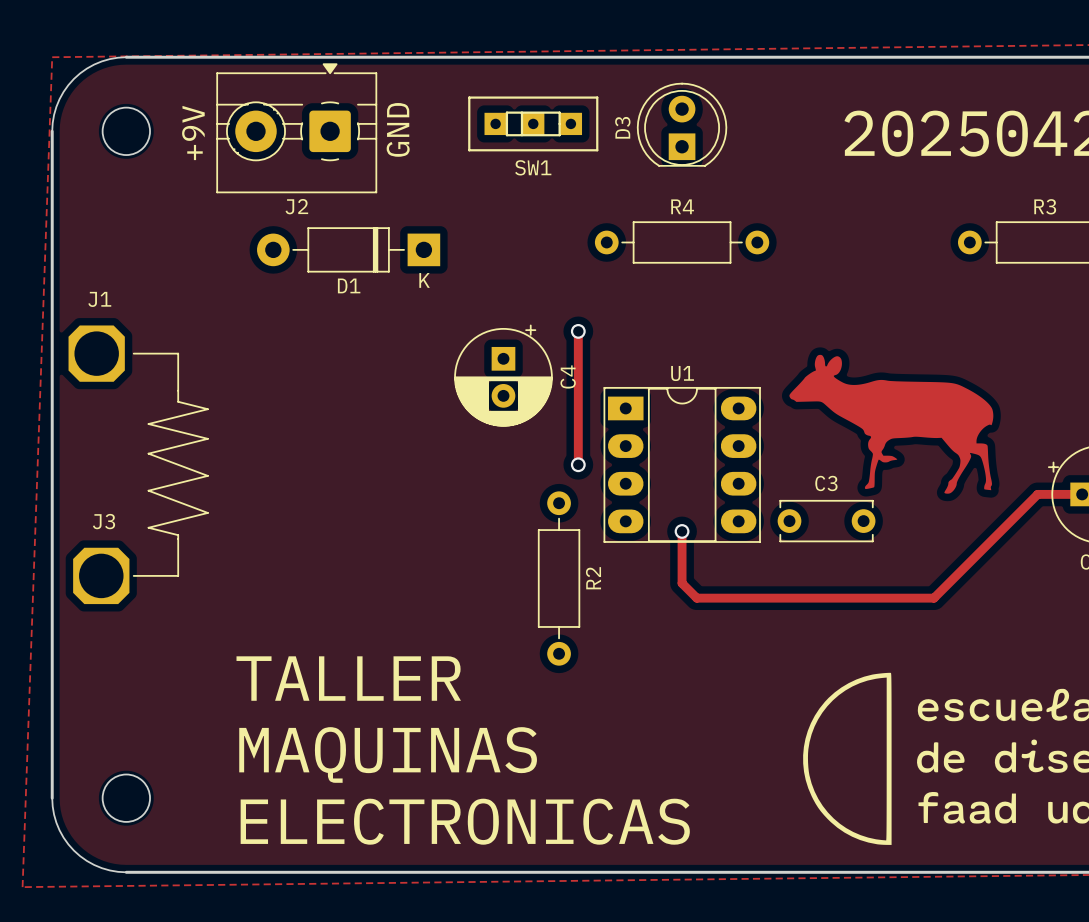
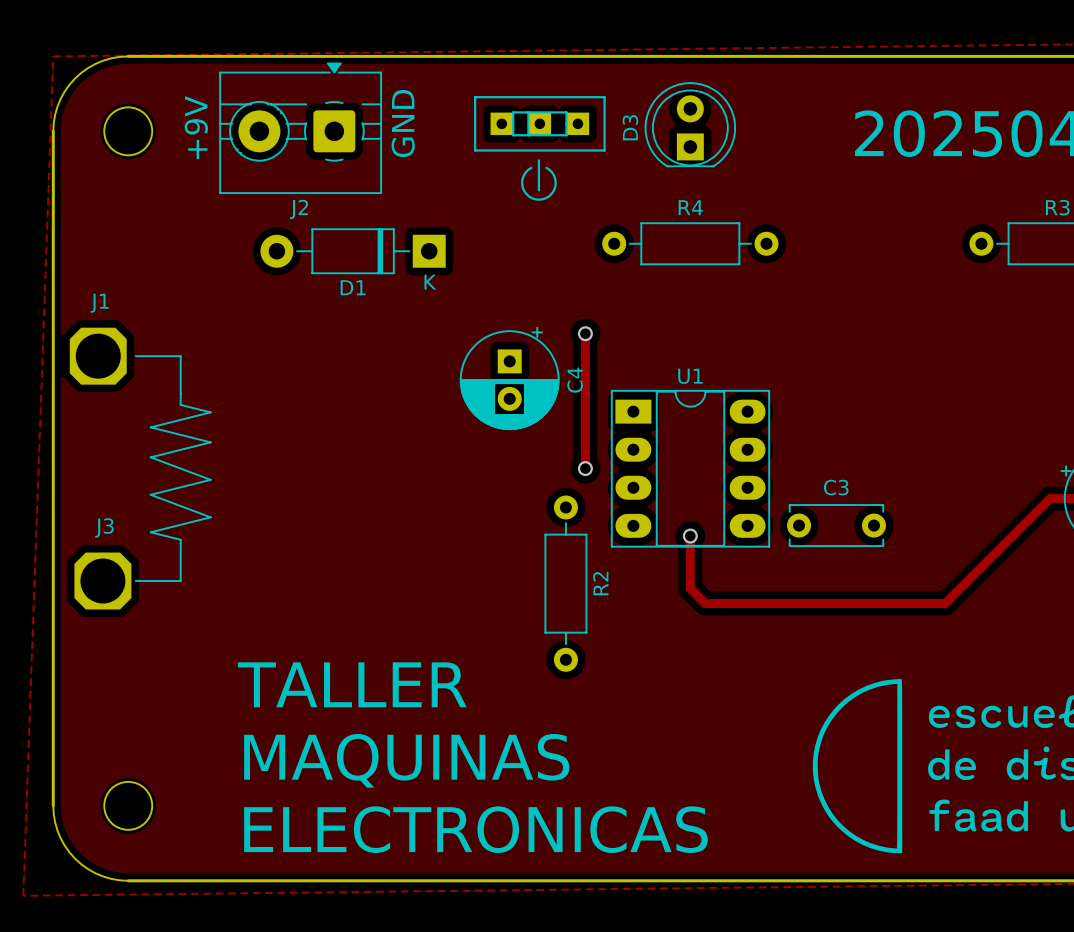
drawing: none -> [521, 159, 557, 201]
SW1 name: SW1 (533, 167) -> none
drawing: [789, 354, 994, 494] -> none

